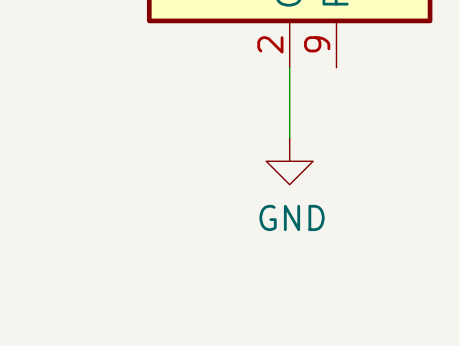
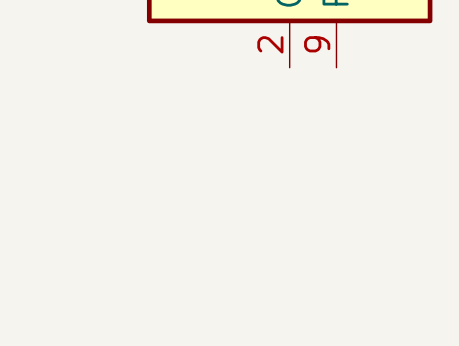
wire: (289, 67) (289, 137) -> none
power symbol: GND (289, 161) -> none

